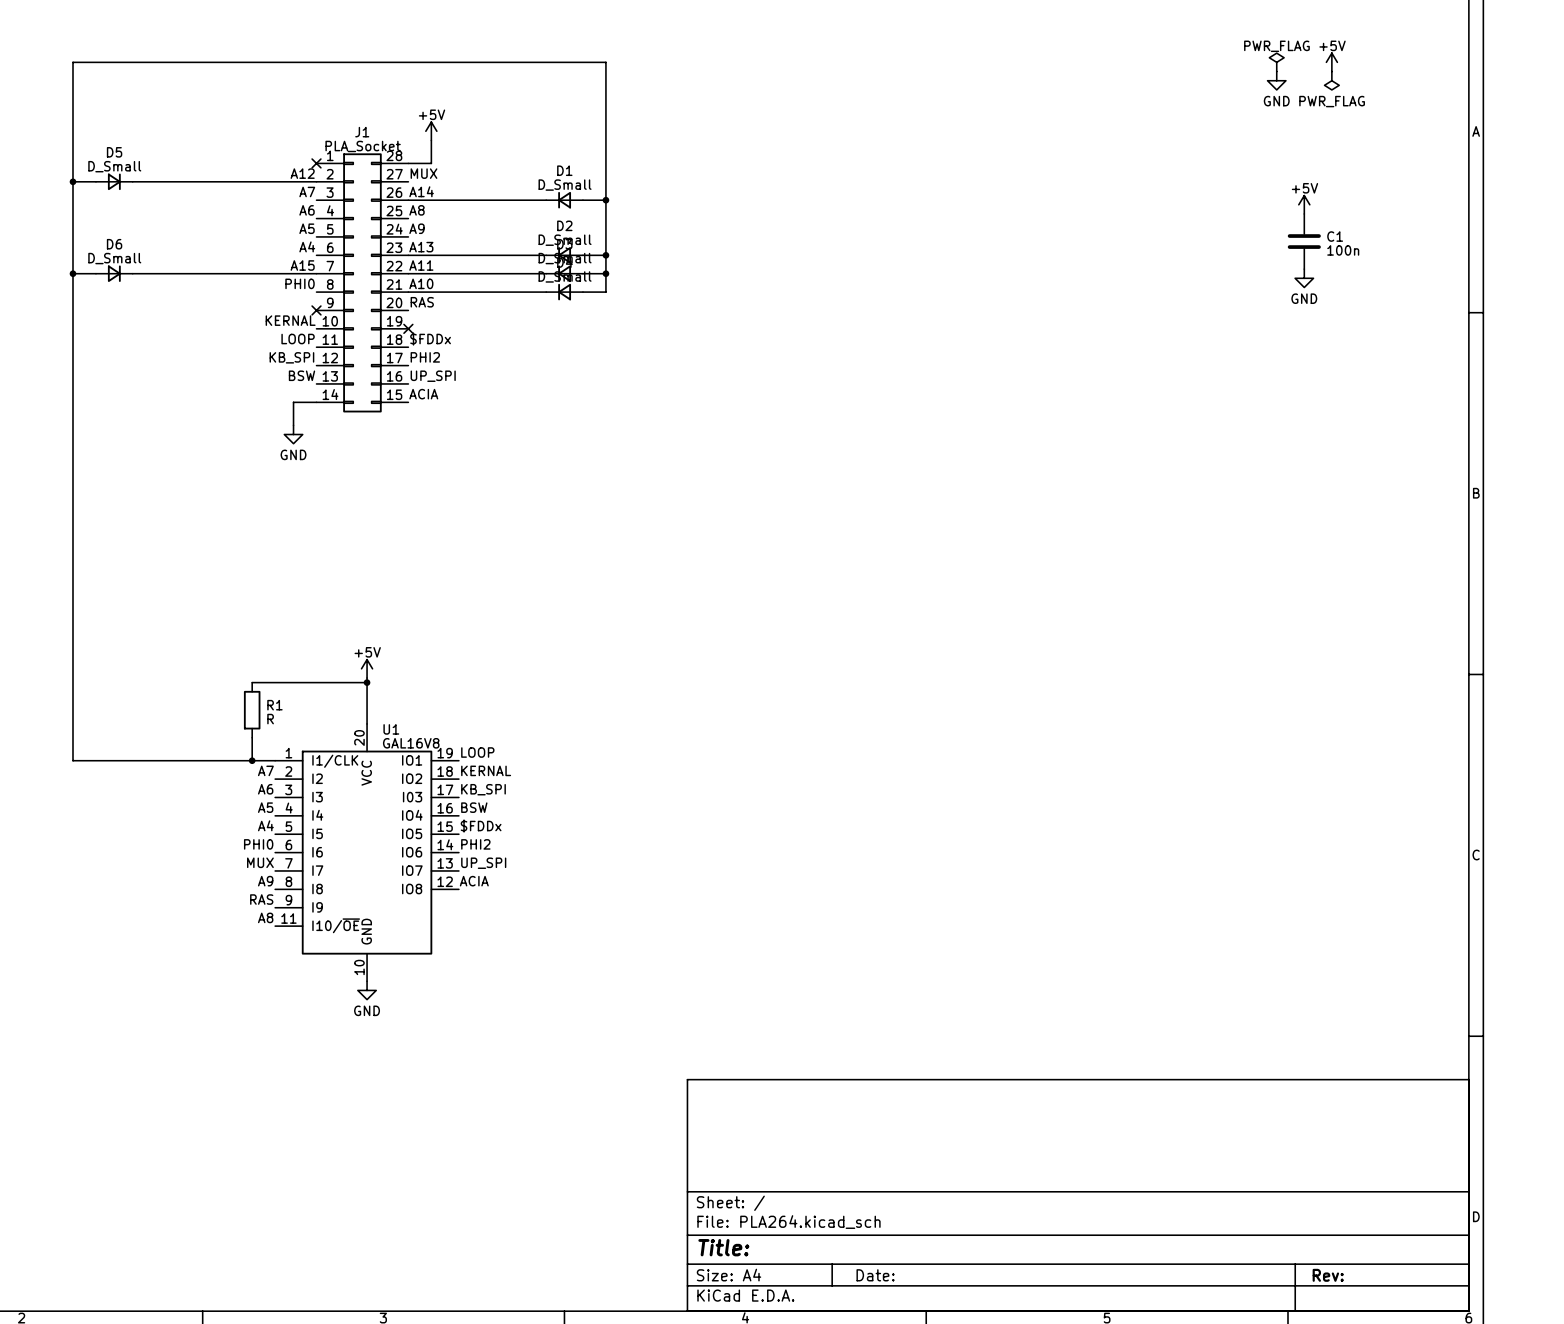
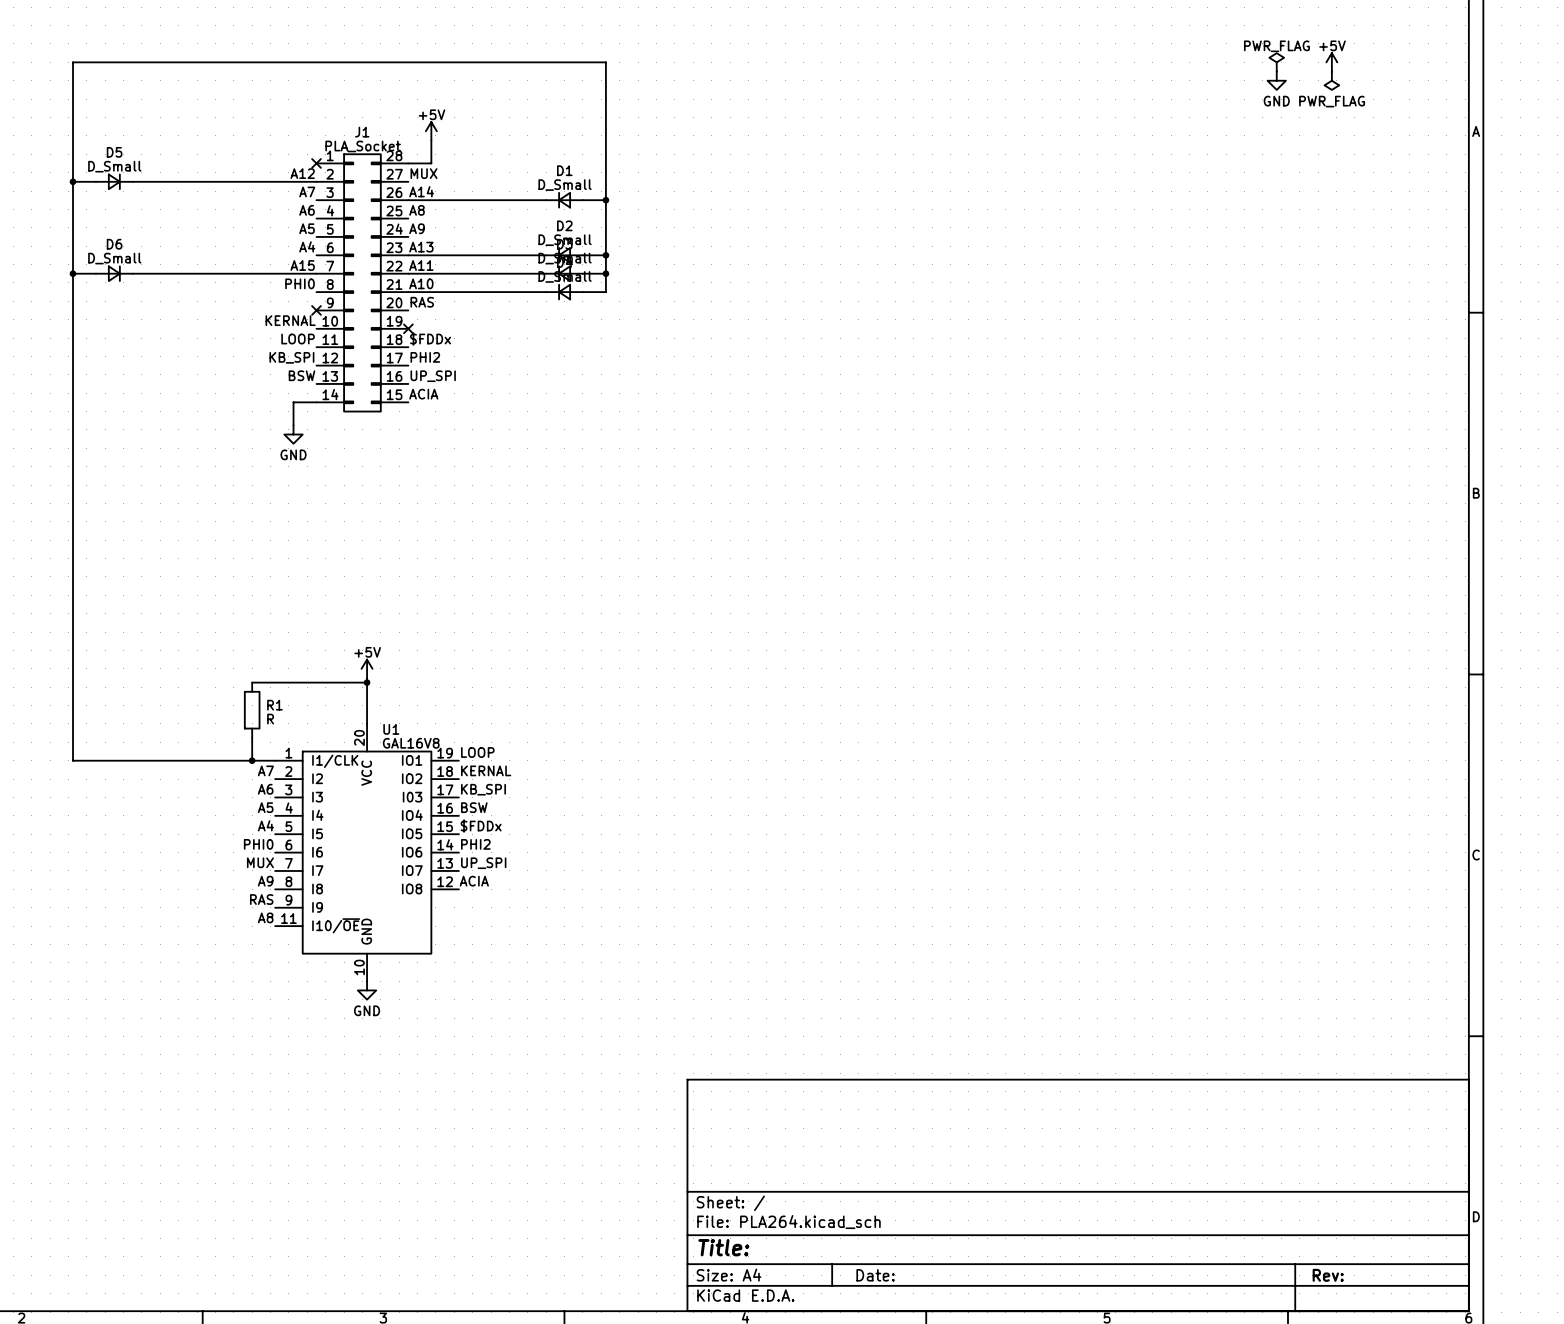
power symbol: +5V (1304, 204) -> none
C1: 100n (1304, 241) -> none
power symbol: GND (1304, 278) -> none

